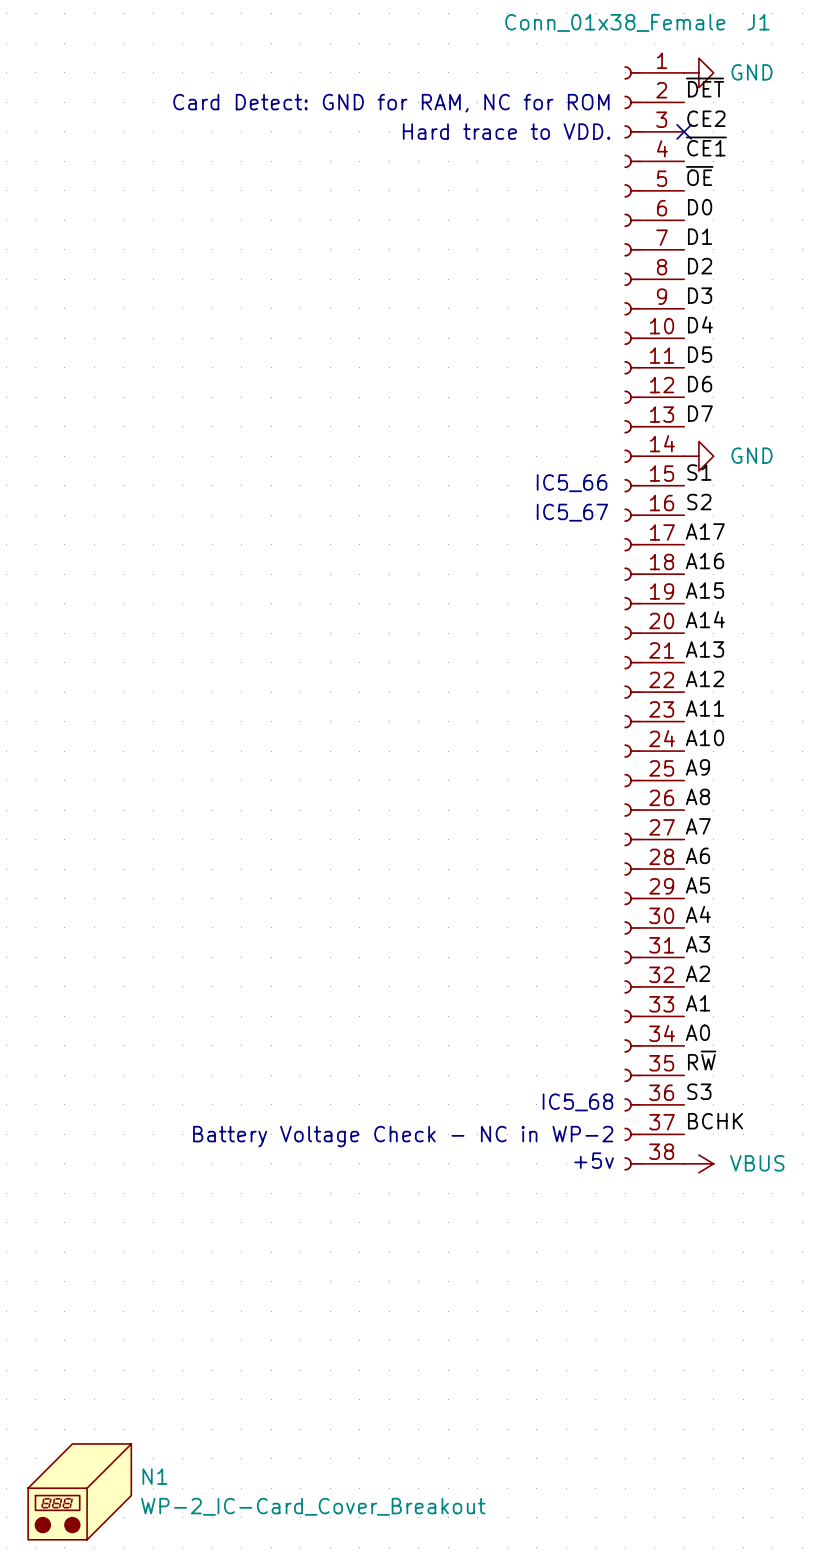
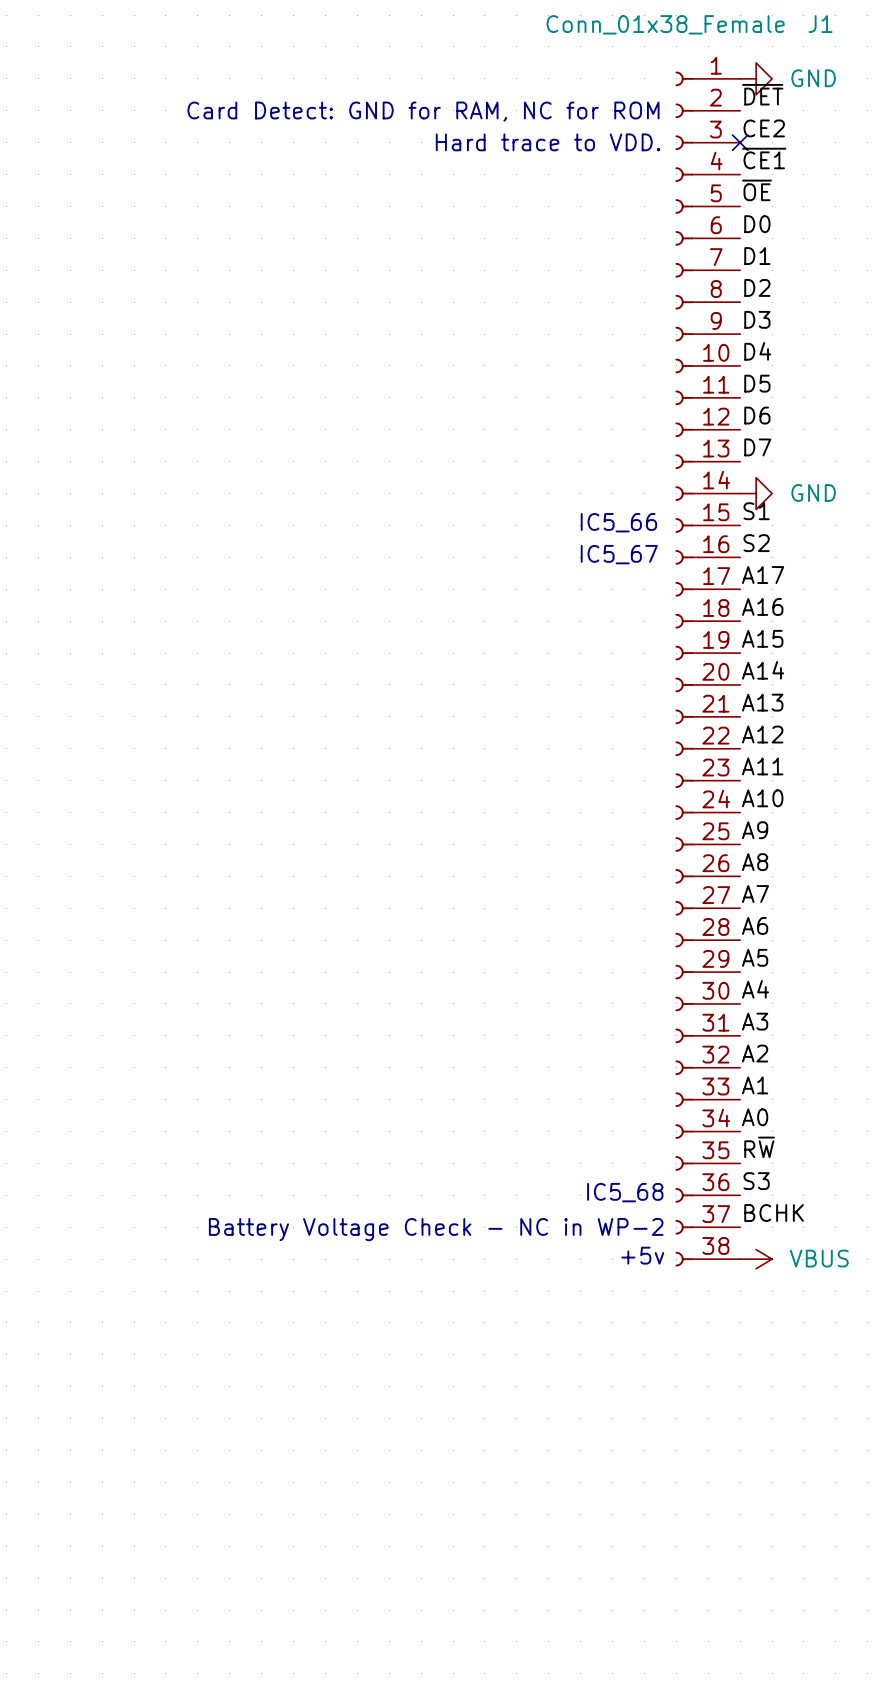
N1: WP-2_IC-Card_Cover_Breakout (79, 1491) -> none

